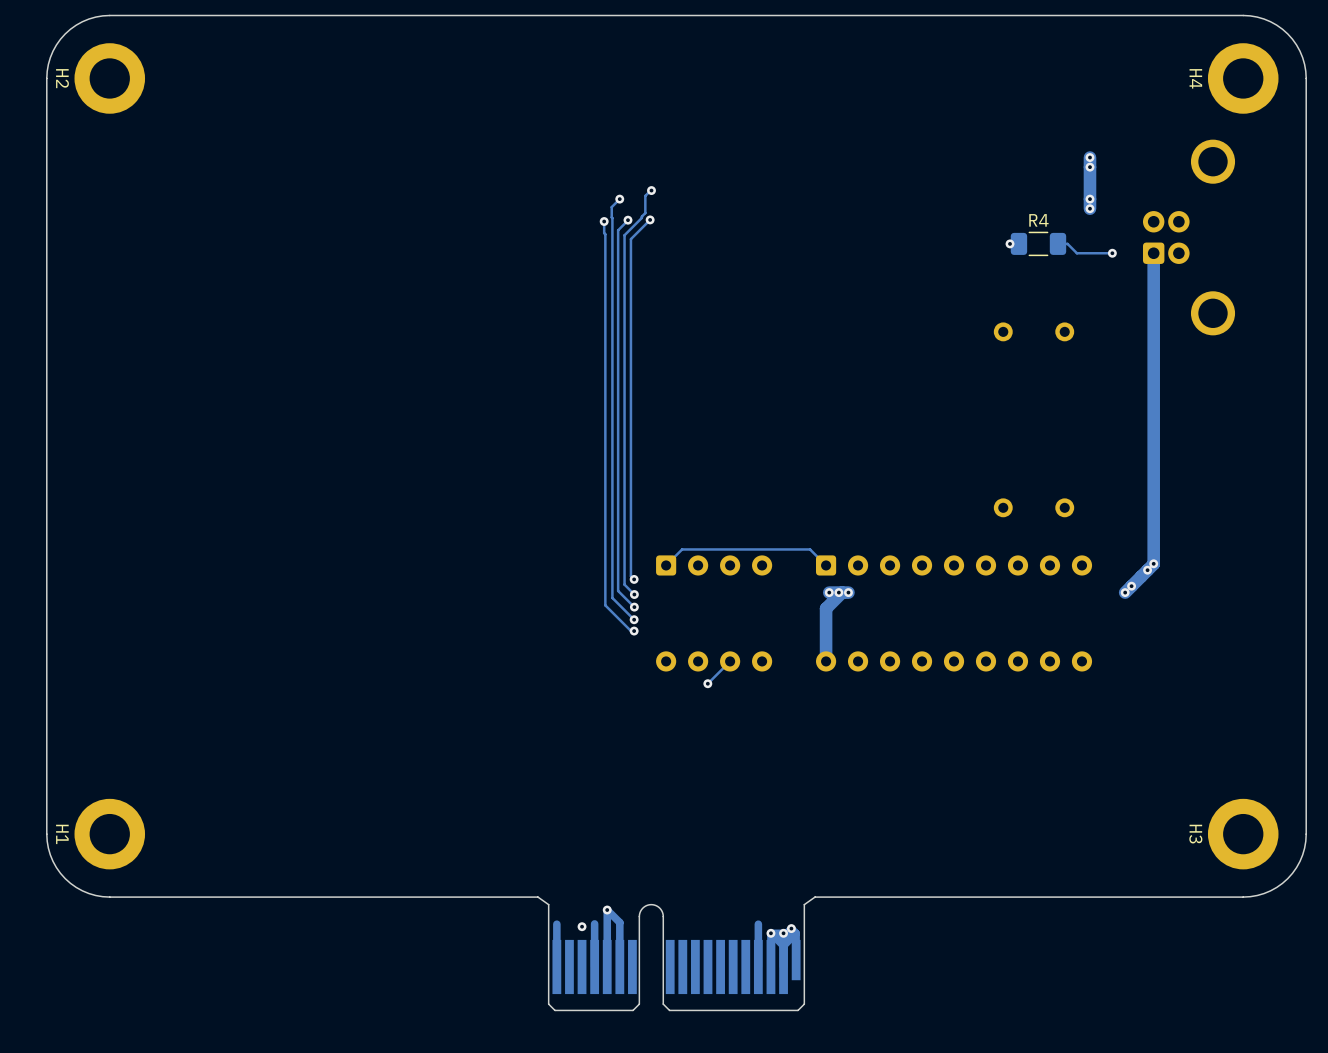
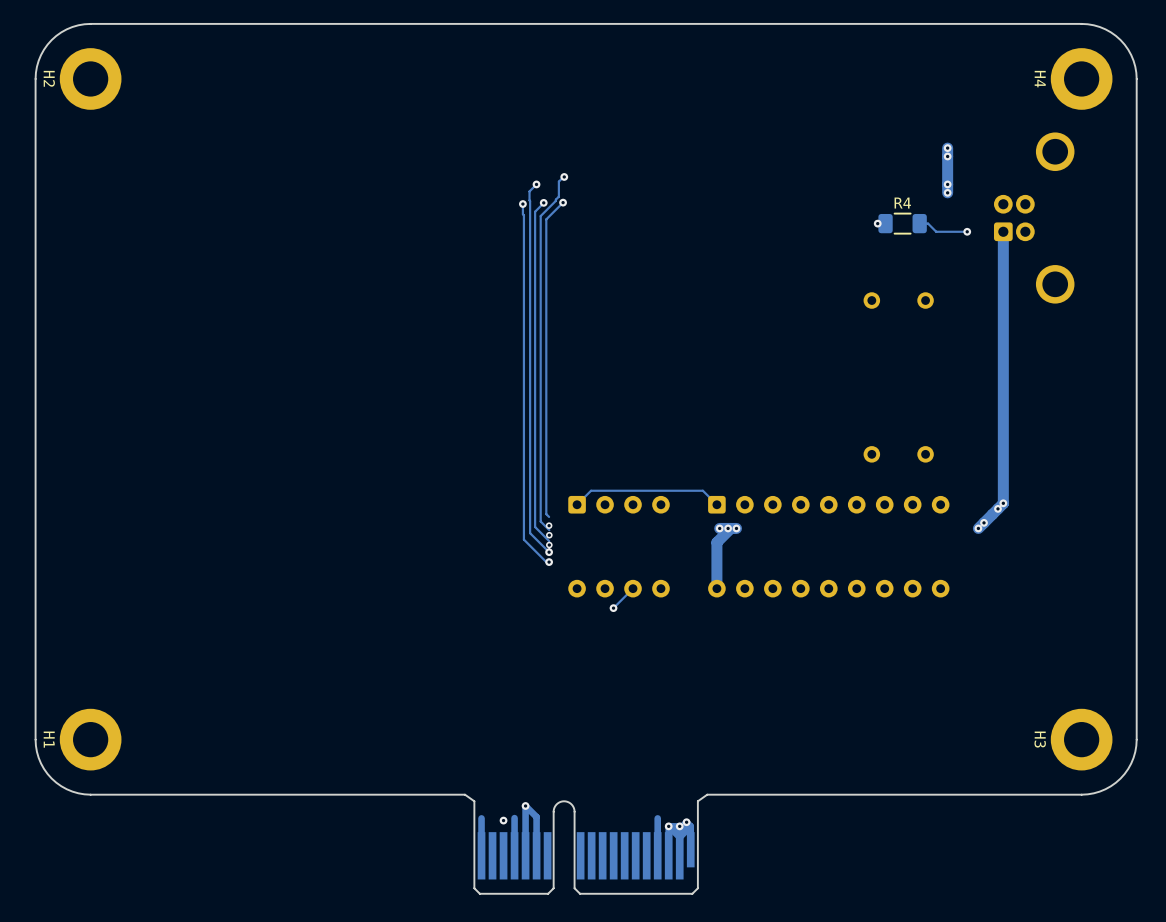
via: (634, 579) -> none
via: none -> (549, 525)
via: (634, 594) -> none
via: none -> (549, 535)
via: (634, 607) -> none
via: none -> (549, 545)

